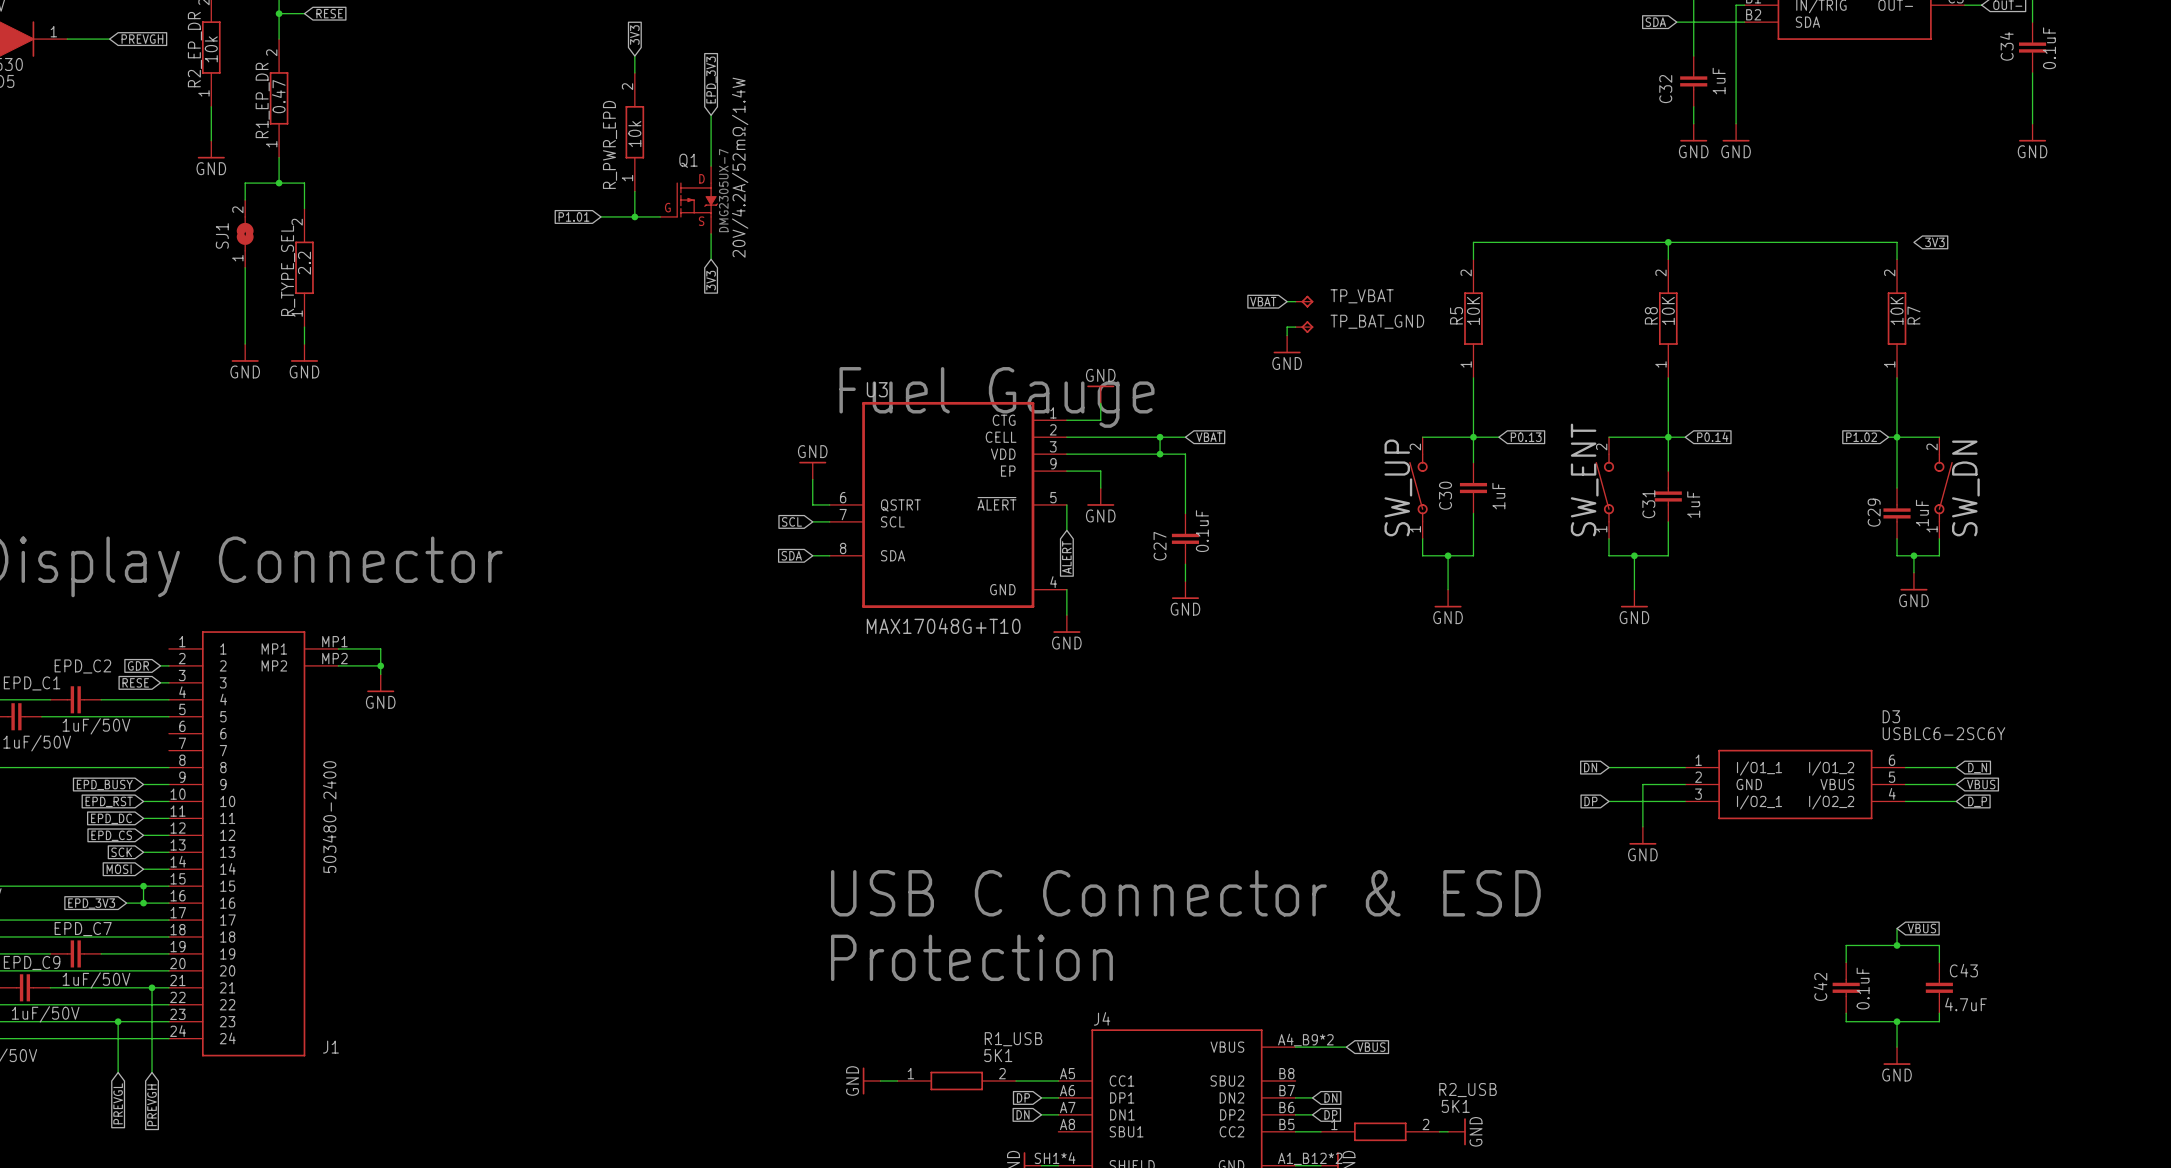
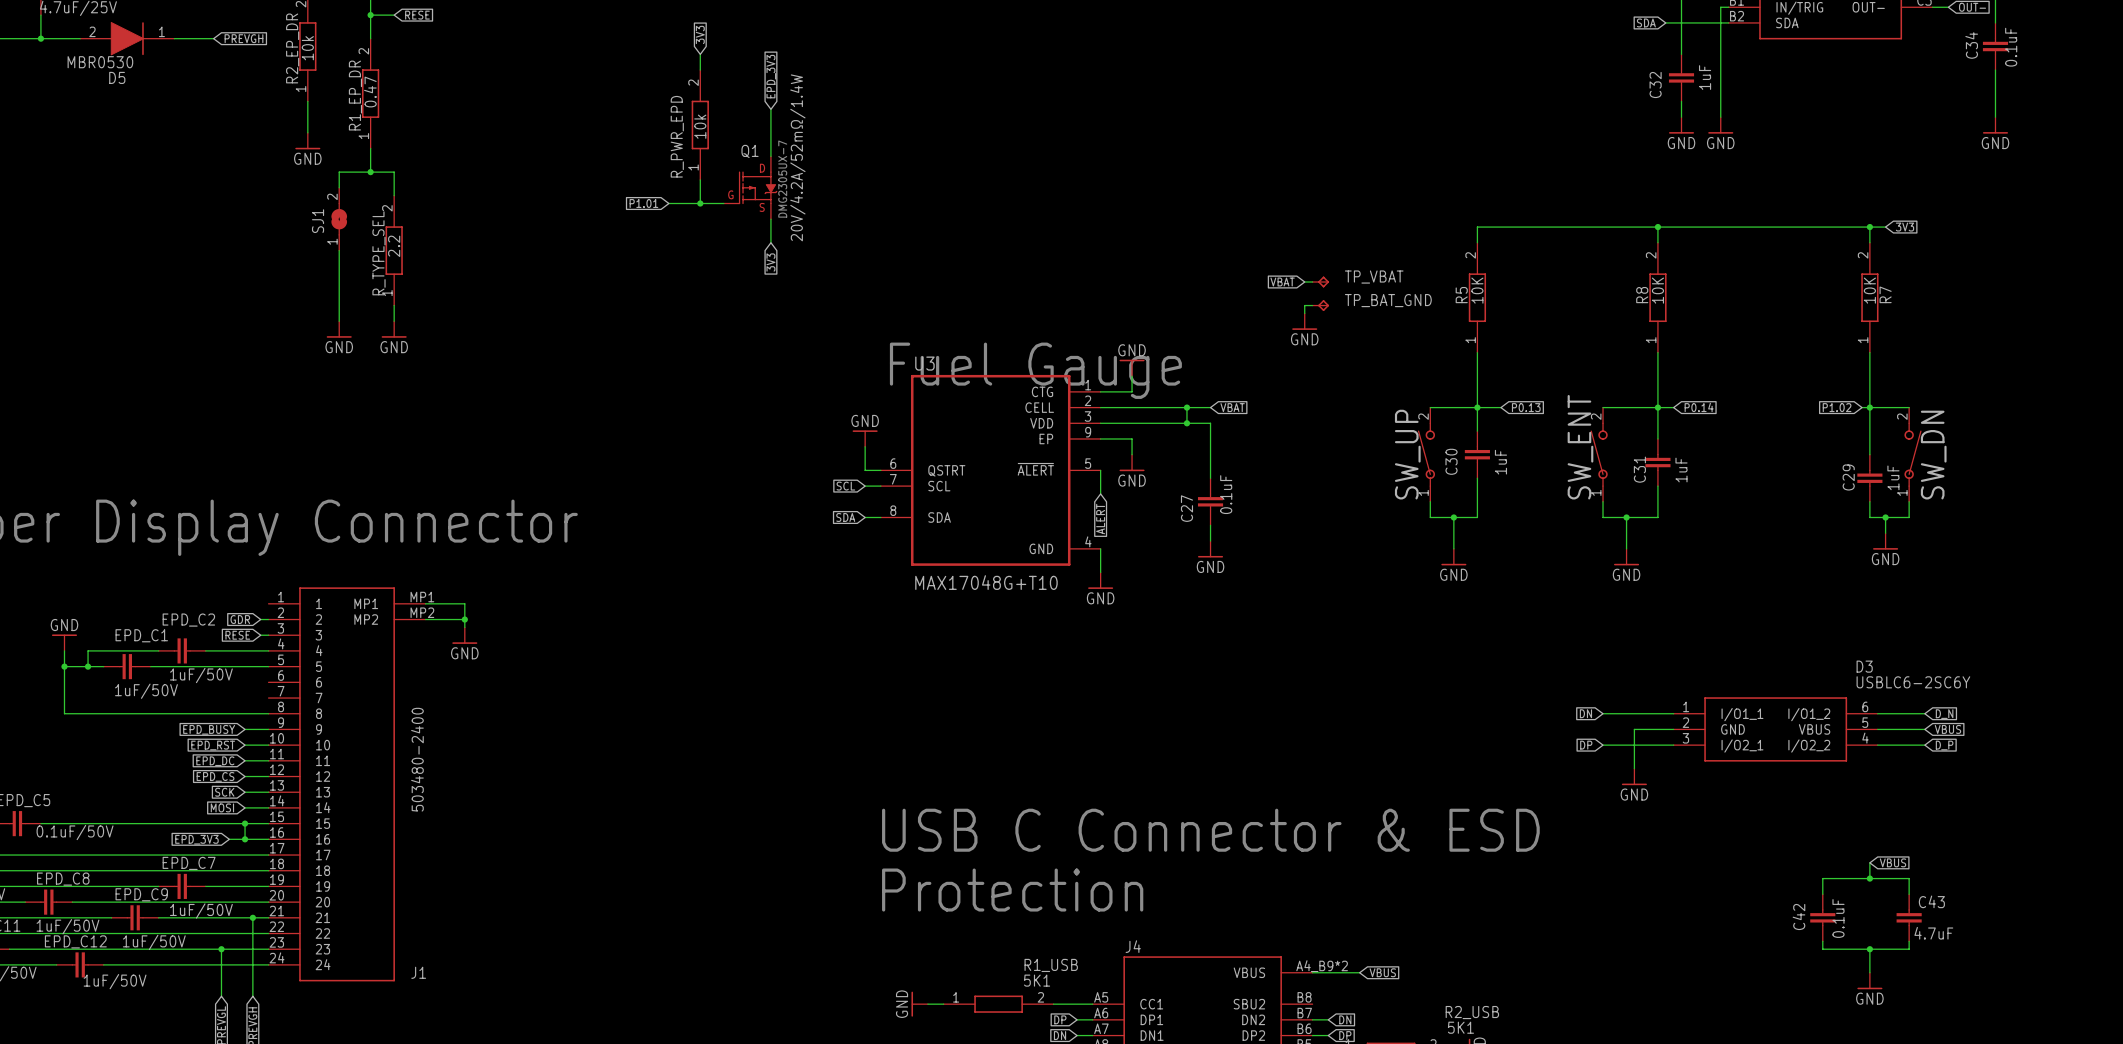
wire: none -> (1869, 227) (1885, 227)
junction: none -> (1869, 227)

